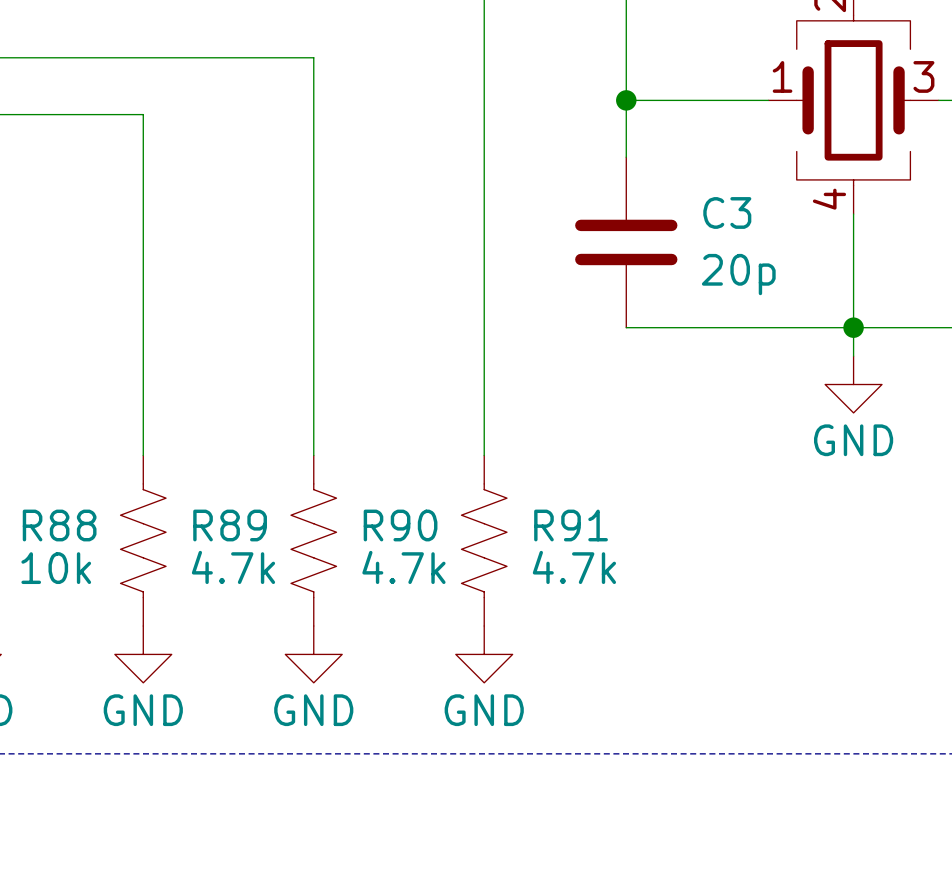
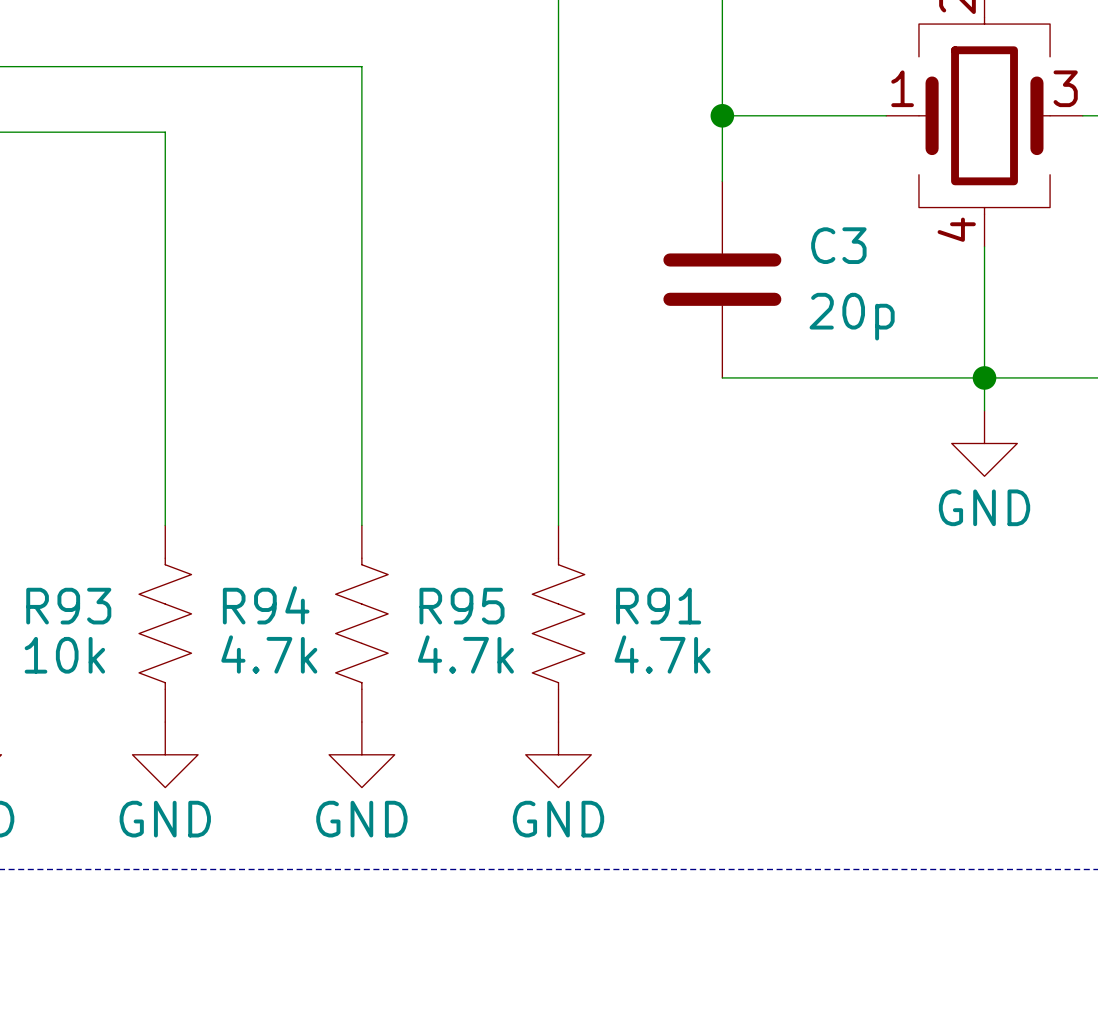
R88 name: R88 (59, 525) -> R93 (68, 606)
R89 name: R89 (230, 525) -> R94 (266, 605)
R90 name: R90 (400, 525) -> R95 (462, 606)

